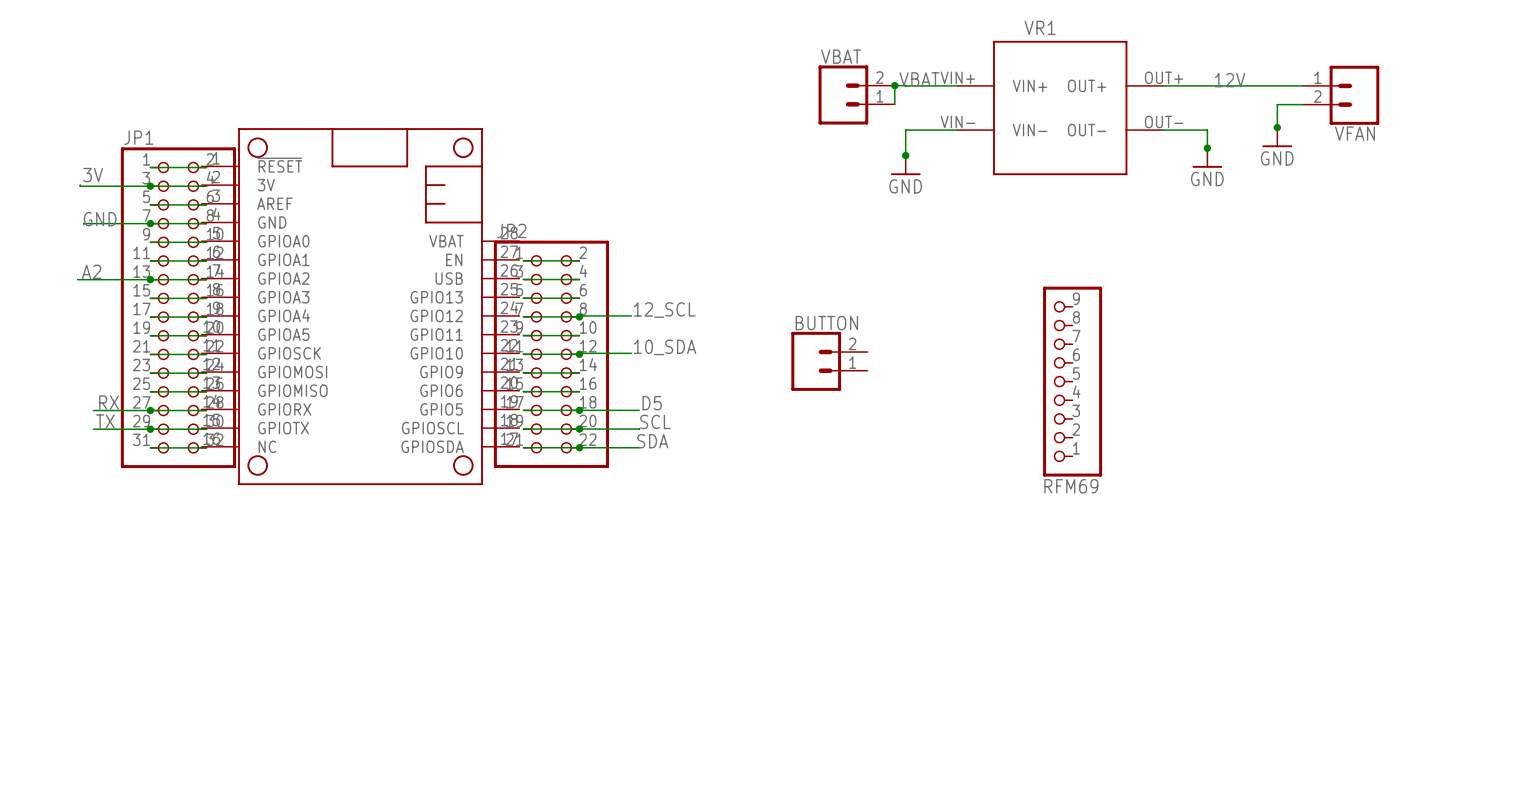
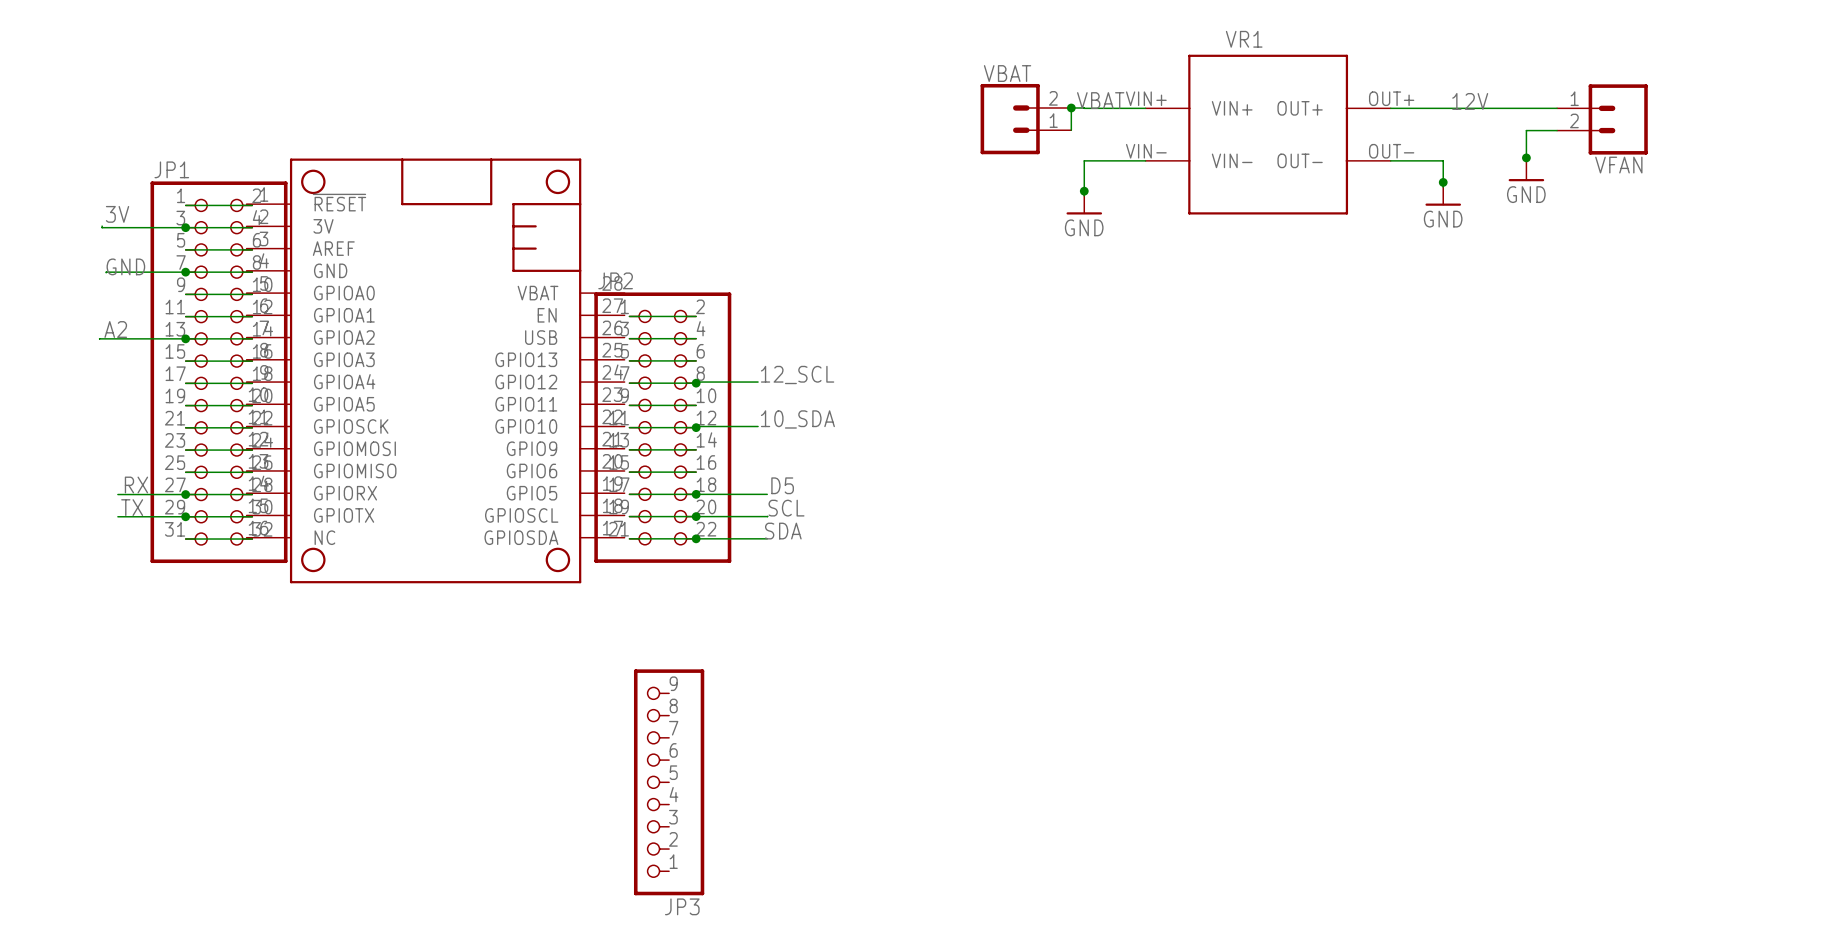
BUTTON: (829, 361) -> none
RFM69: (1072, 381) -> none
JP3: none -> (669, 782)

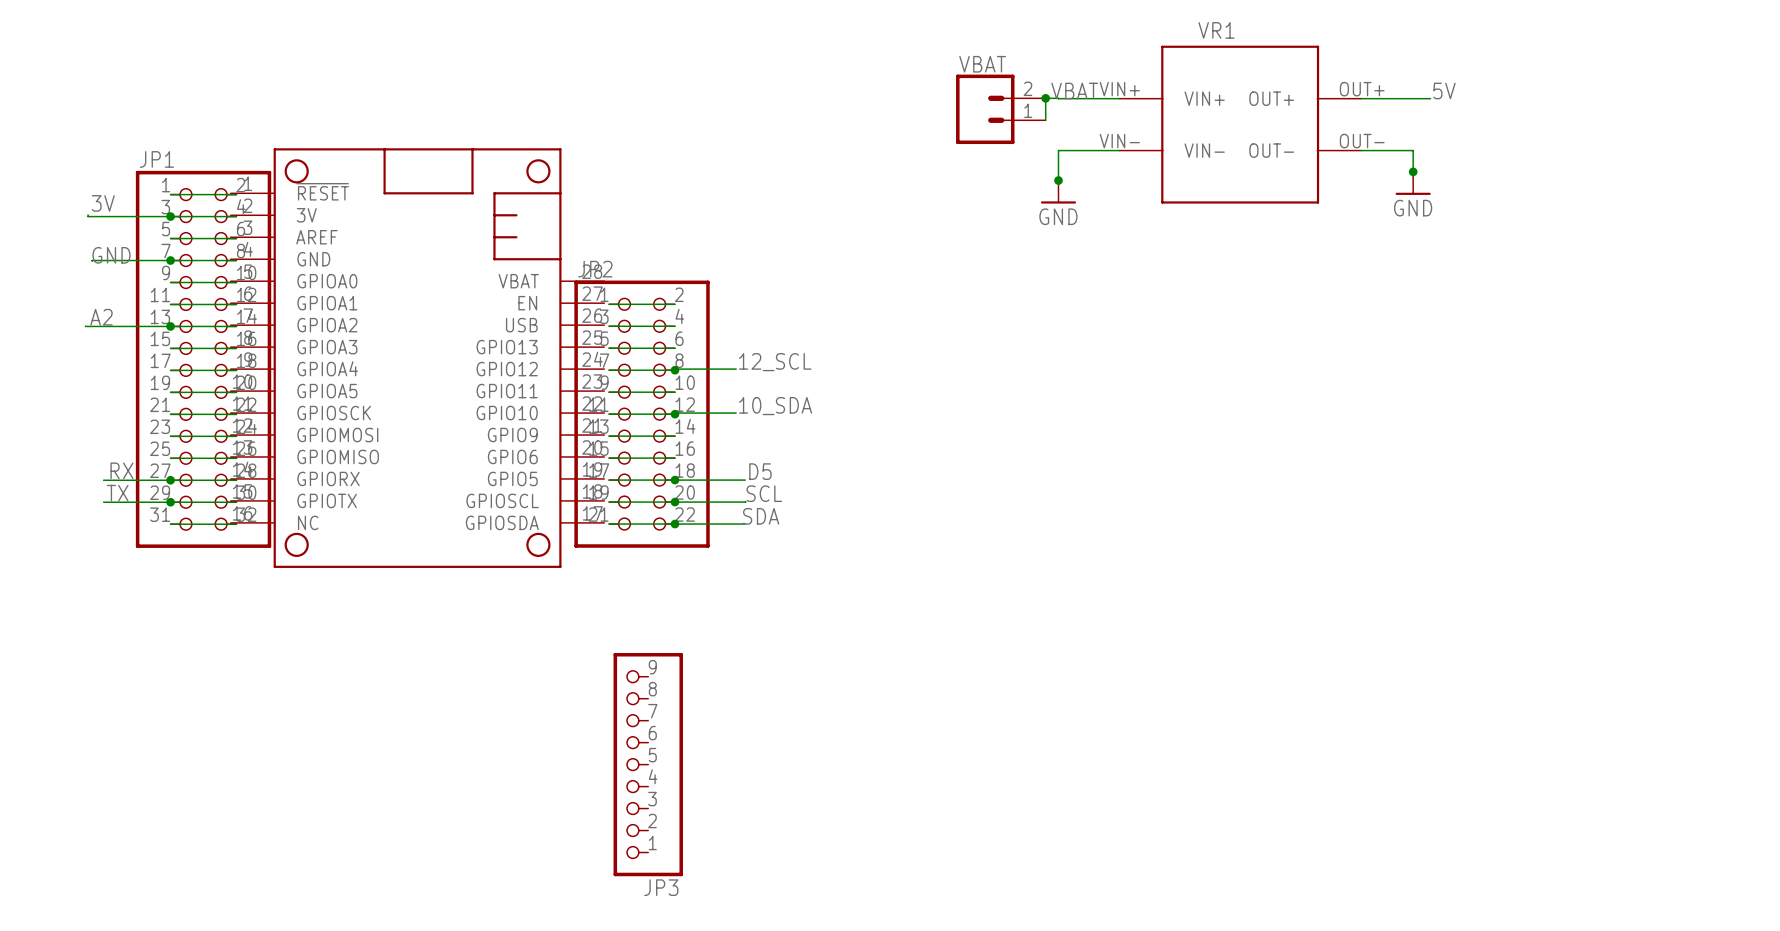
label: none -> 5V (1444, 90)
label: 12V (1470, 101) -> none
wire: (1460, 108) (1557, 108) -> none
VFAN: (1602, 119) -> none
wire: (1557, 130) (1526, 130) (1525, 159) -> none
junction: (1526, 157) -> none
power symbol: GND (1526, 169) -> none

